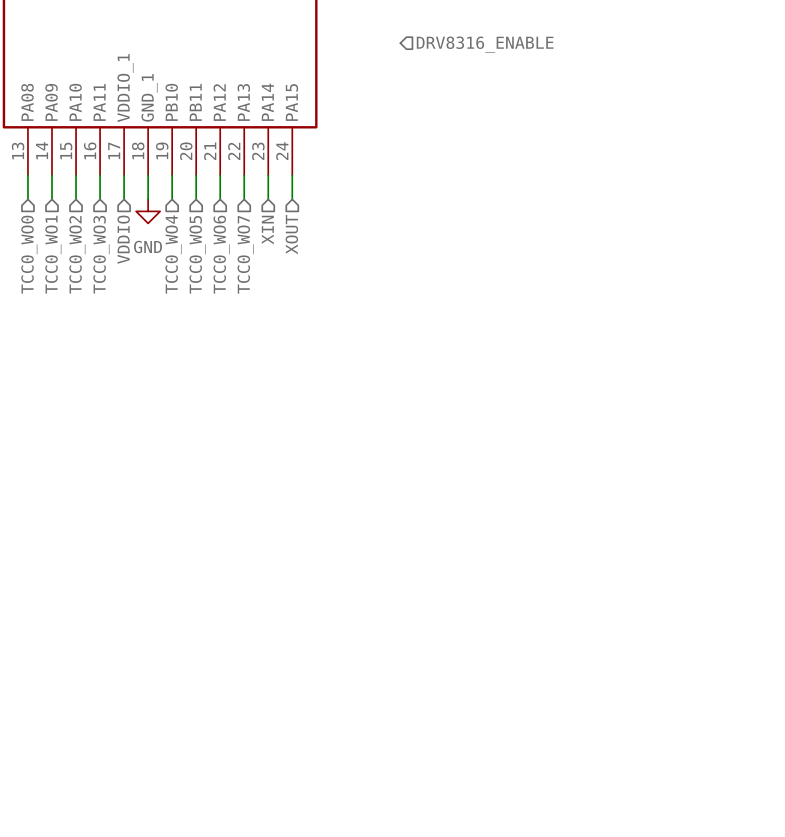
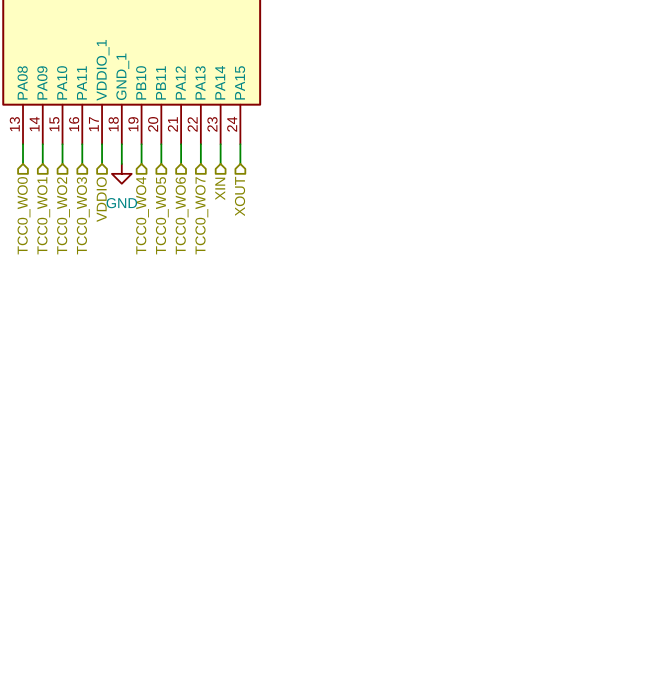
hierarchical label: DRV8316_ENABLE (485, 44) -> none

